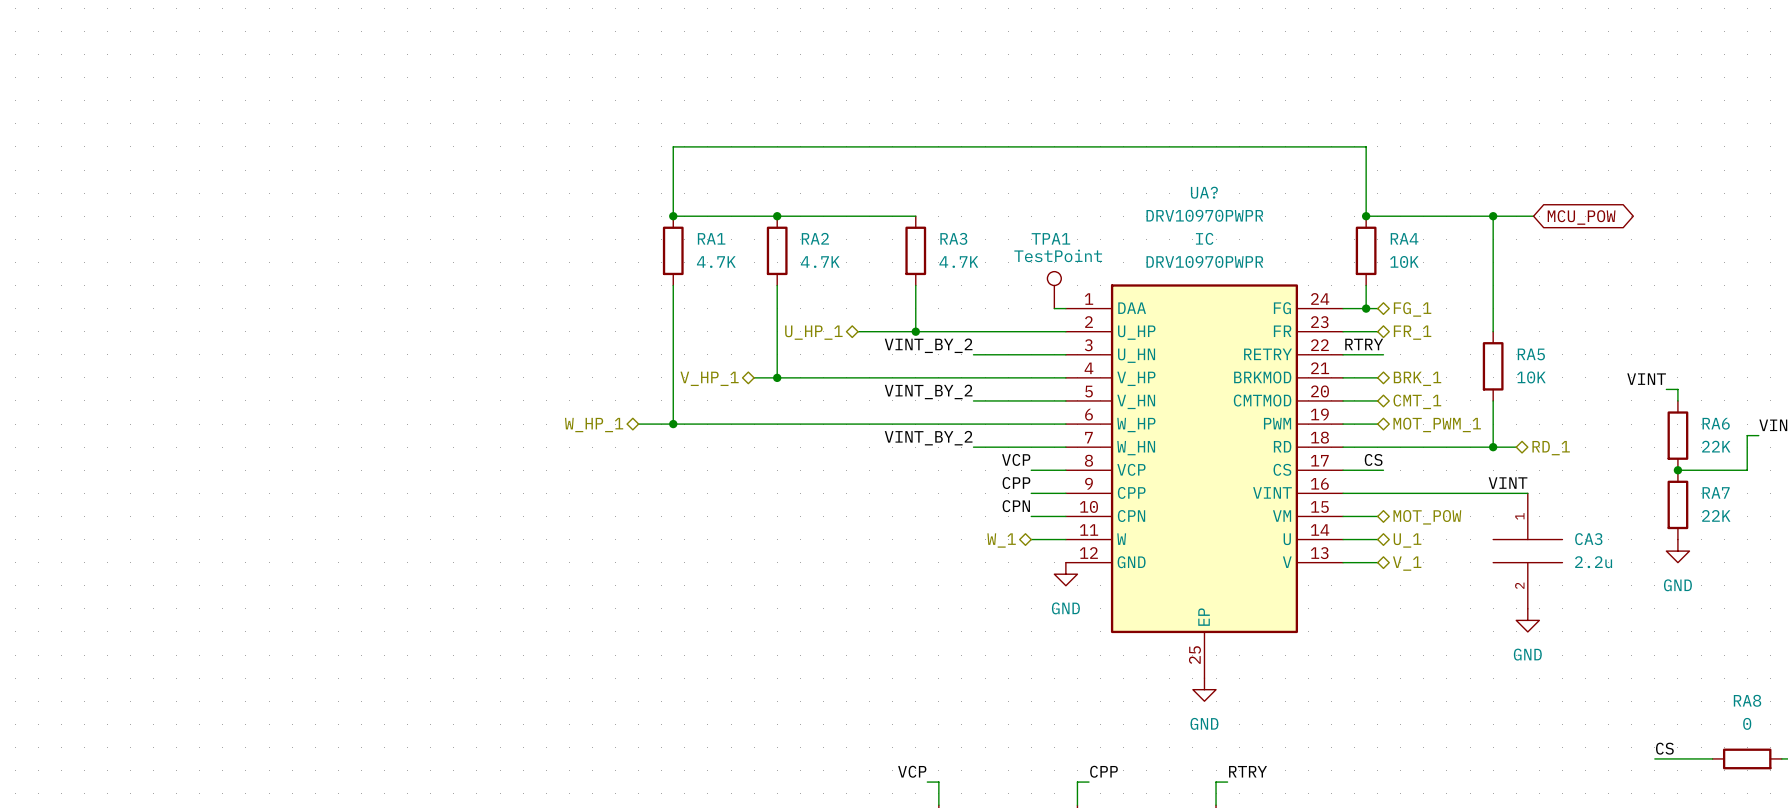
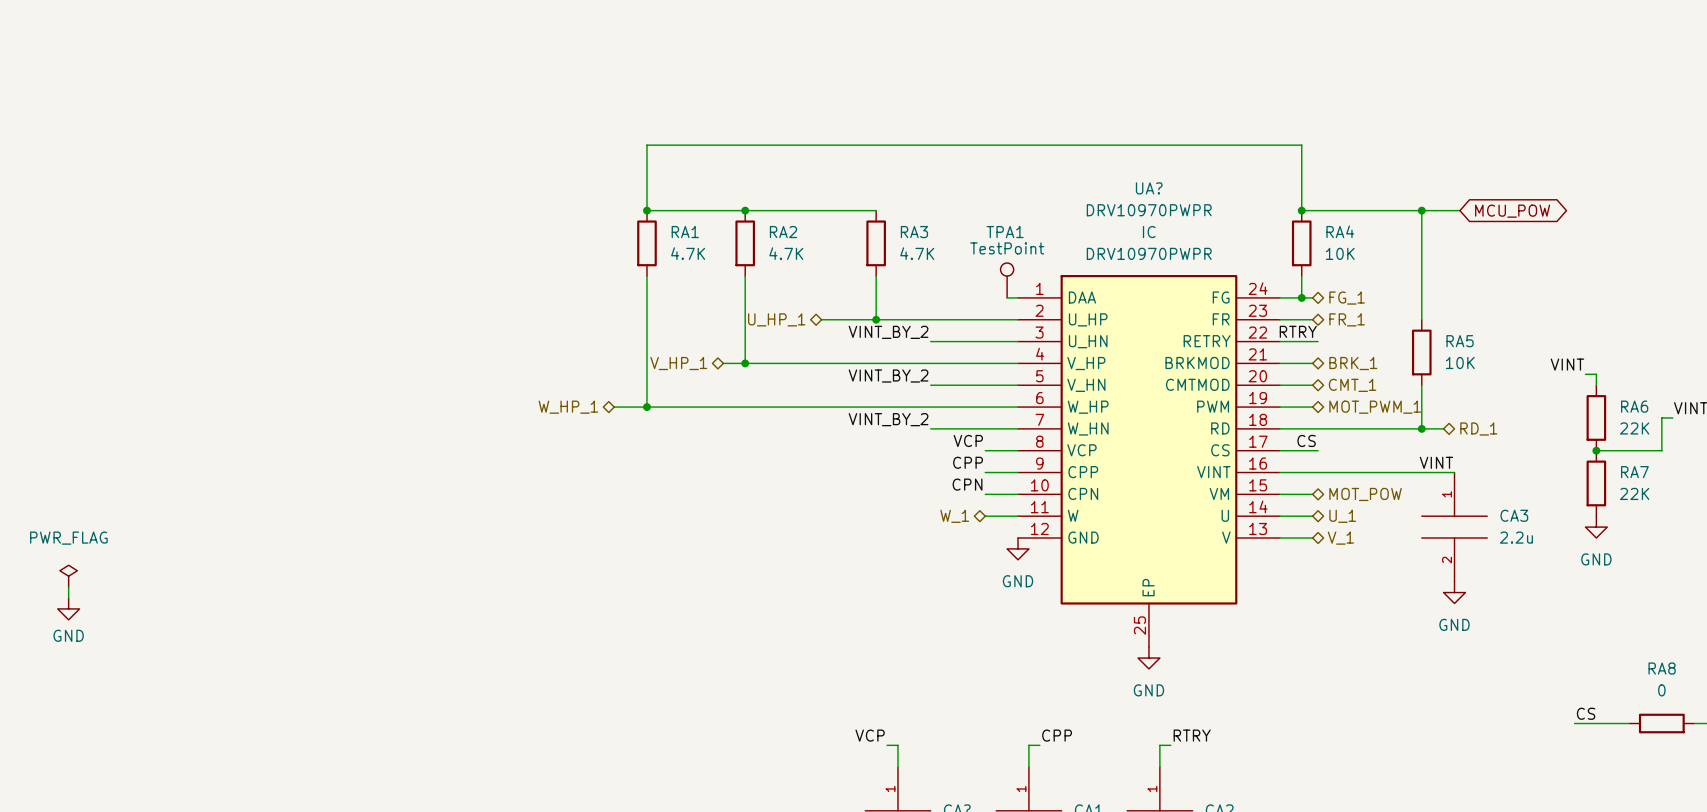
power symbol: none -> PWR_FLAG (68, 576)
wire: none -> (68, 587) (68, 598)
power symbol: none -> GND (68, 608)

